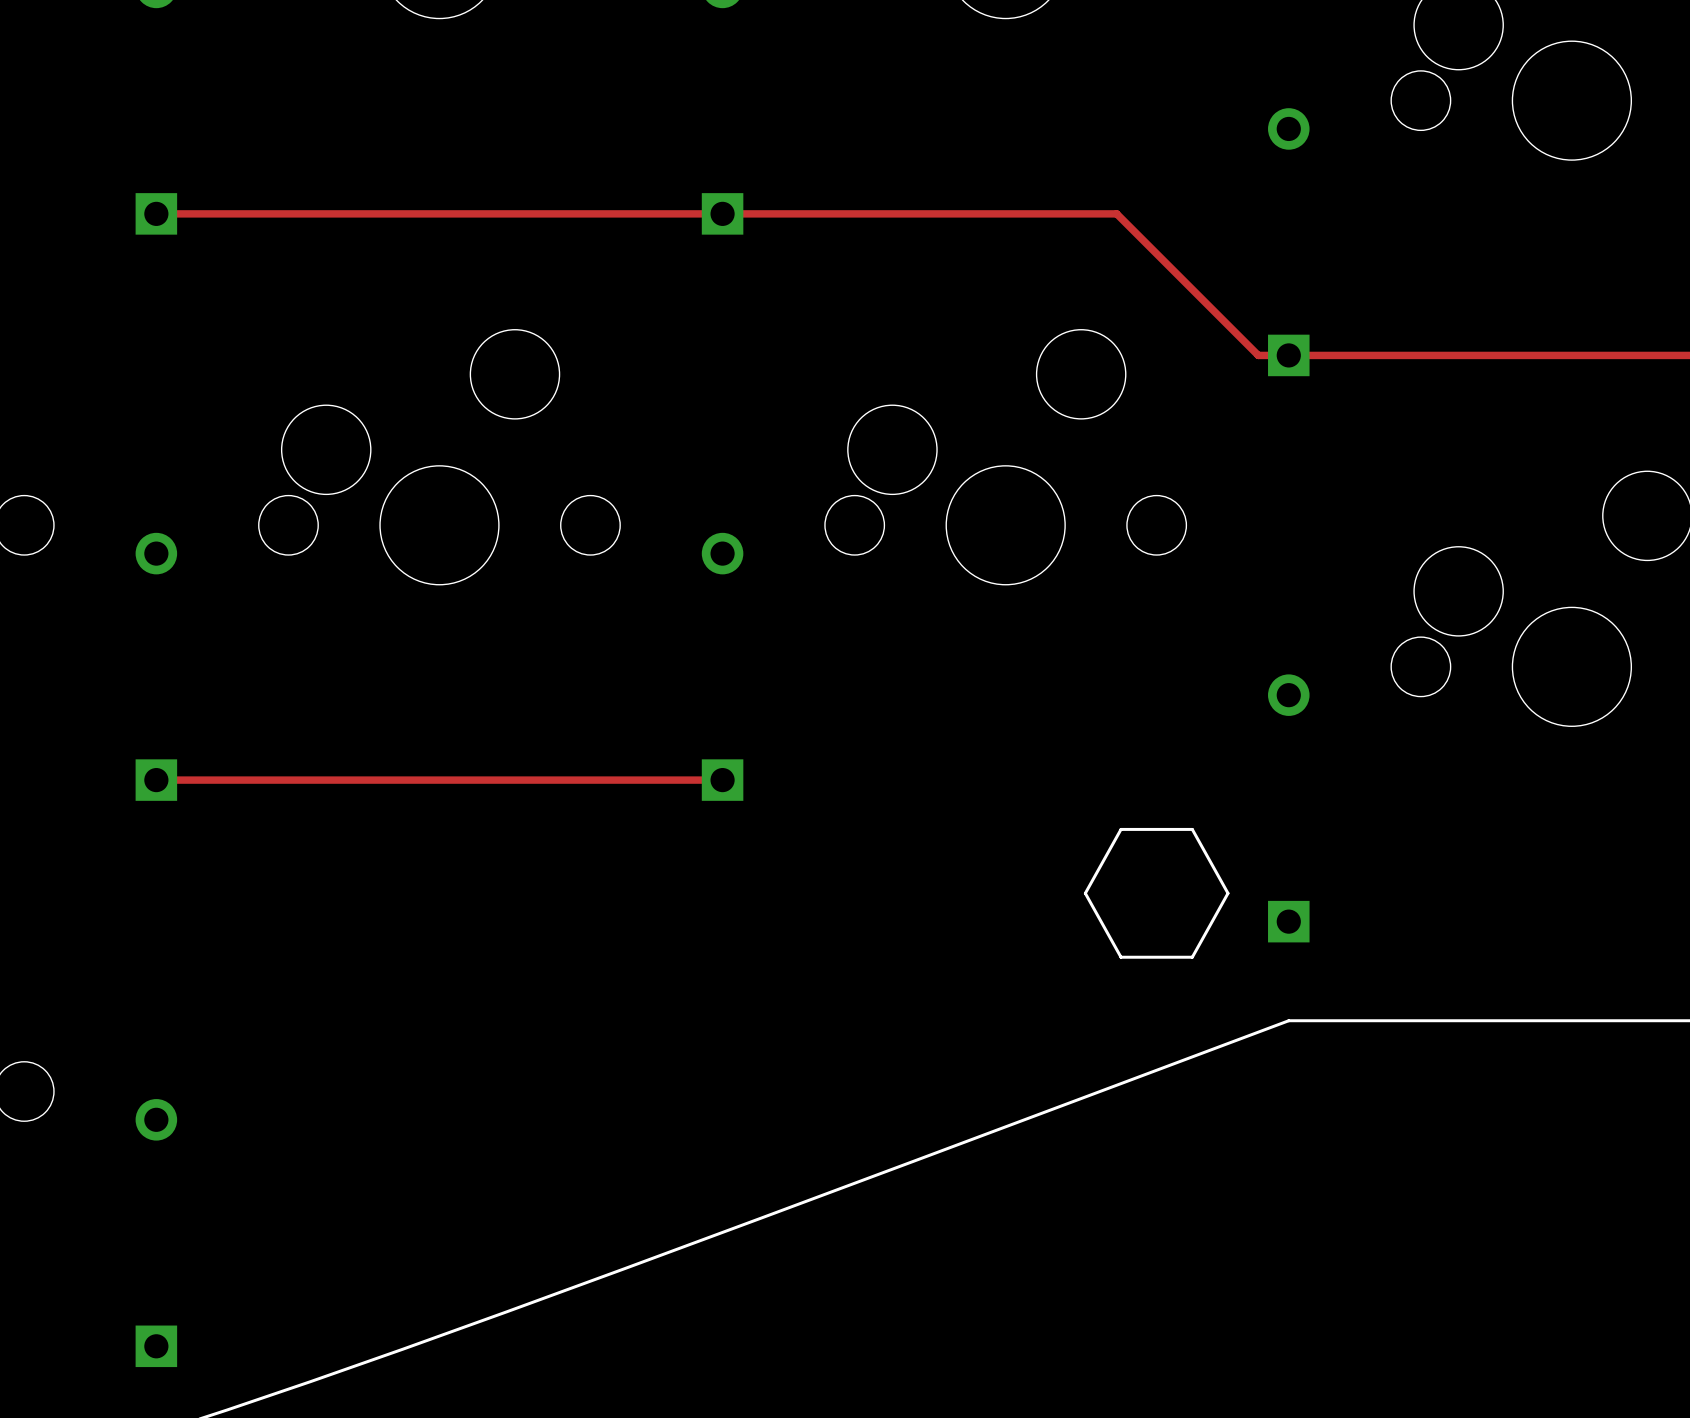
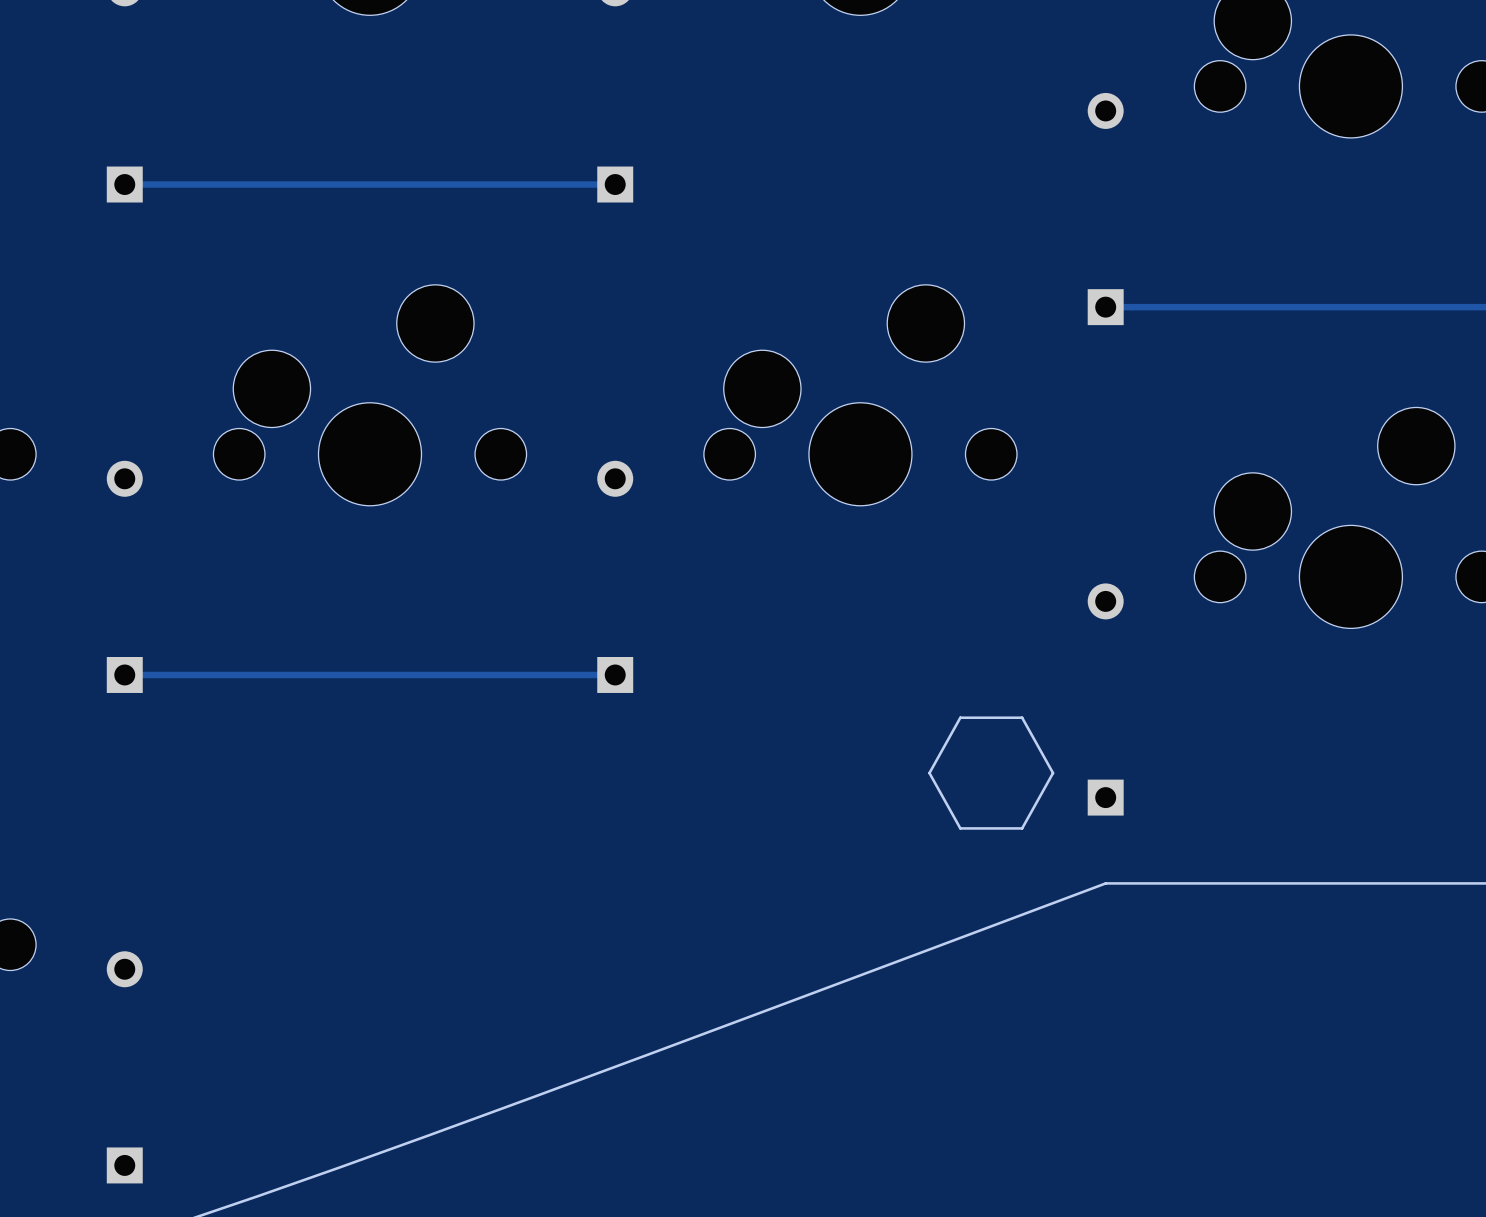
track: (722, 213) (1116, 213) (1258, 355) (1288, 355) -> none

